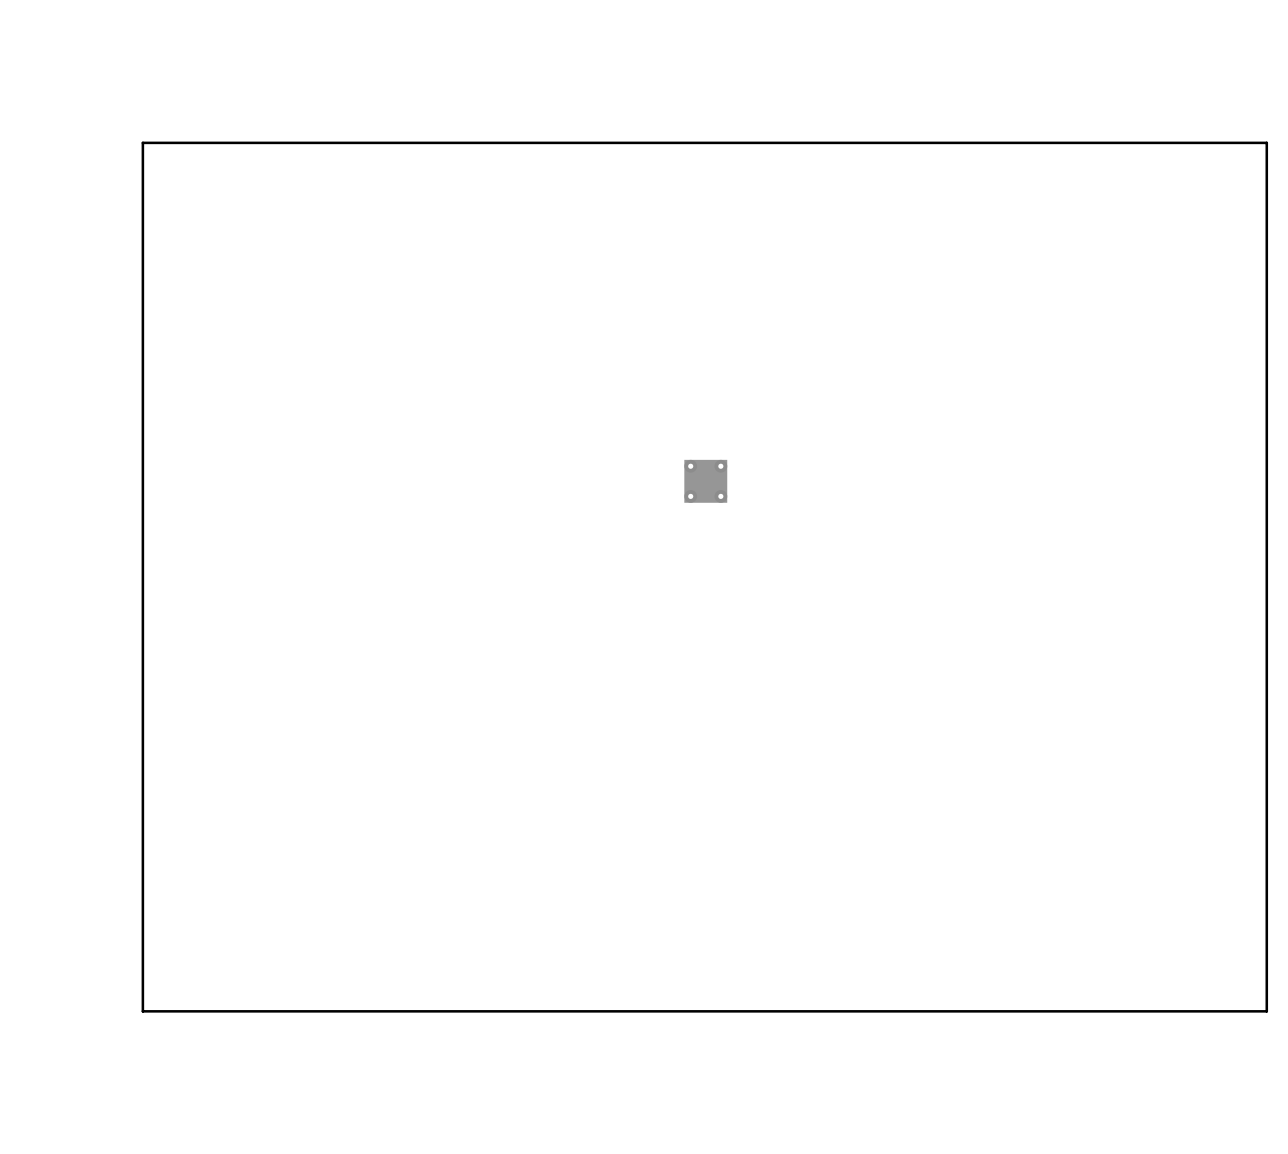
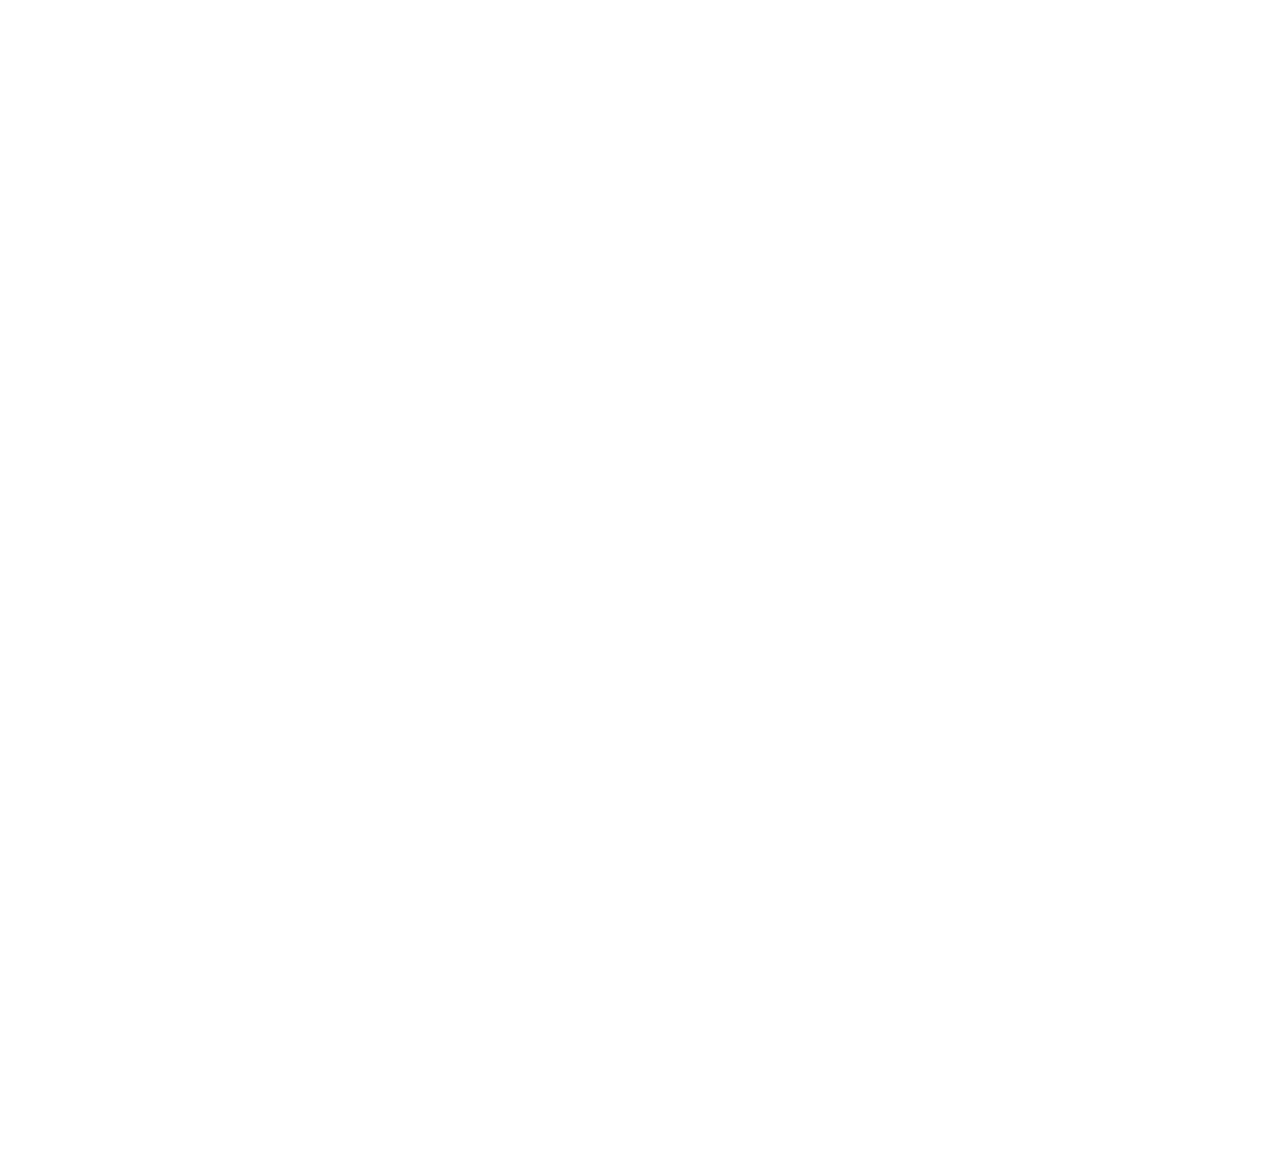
board edge: (1266, 142) (142, 142) (142, 1011) (1266, 1011) (1266, 142) -> none
part: (705, 481) -> none

